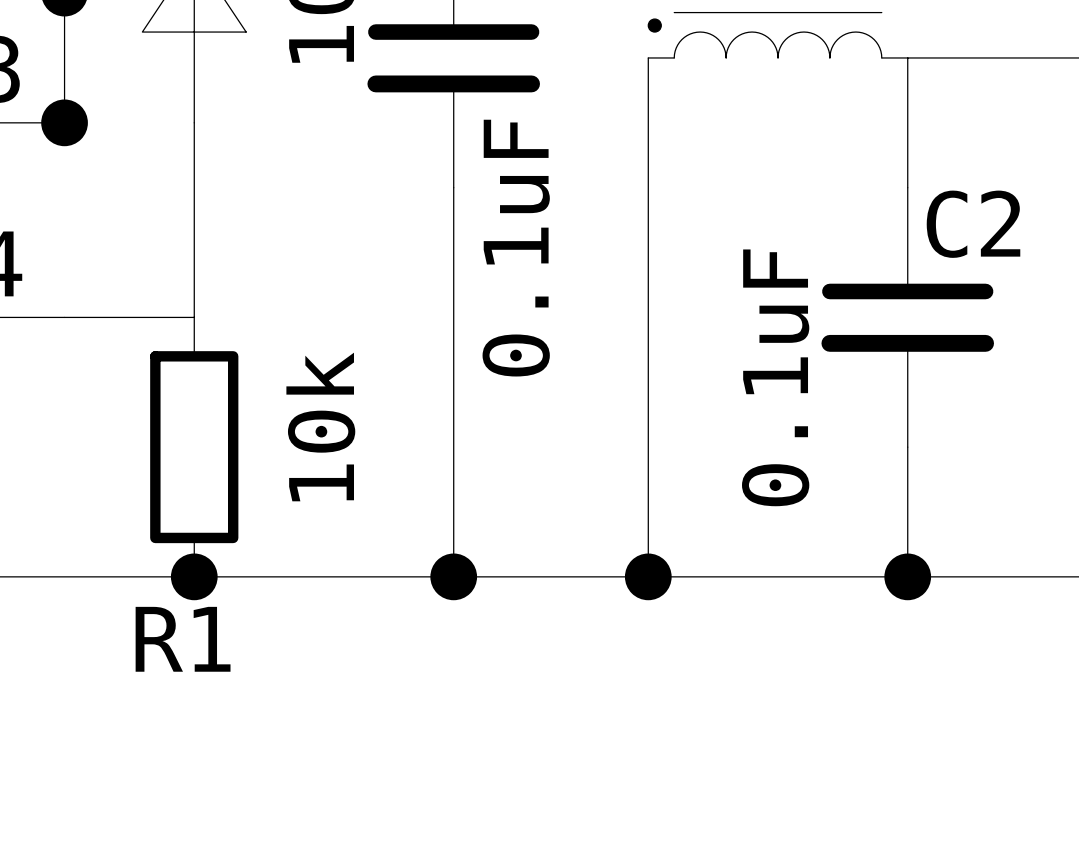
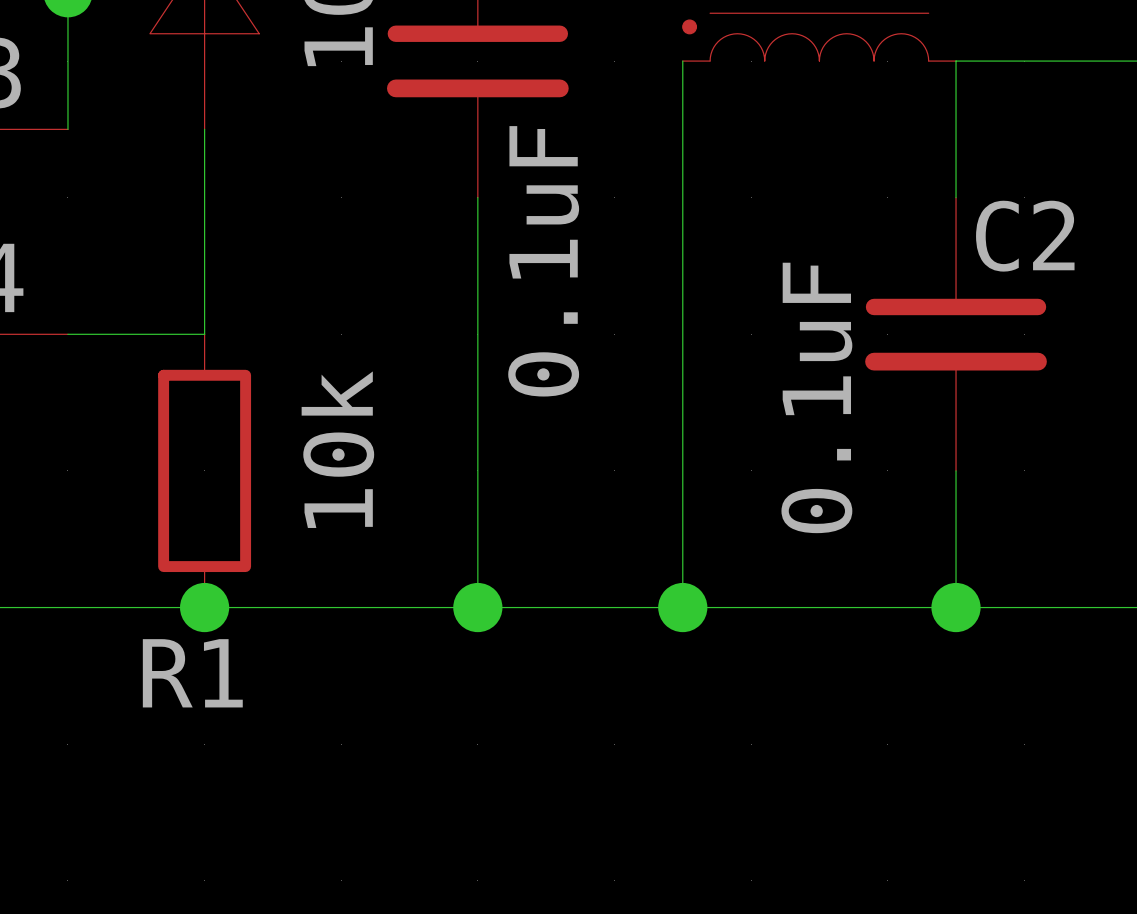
junction: (64, 122) -> none

